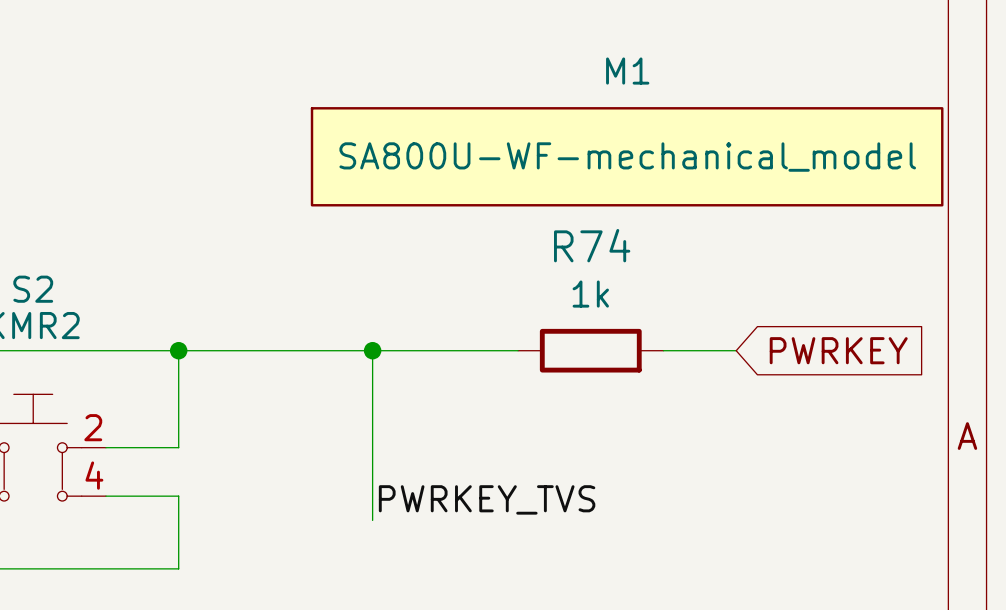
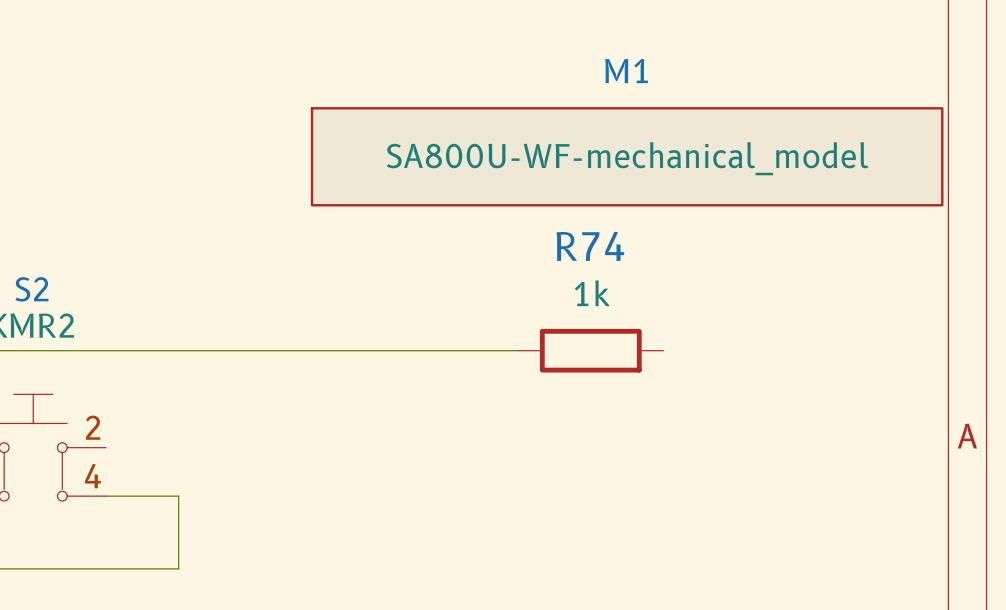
wire: (178, 350) (178, 447) (105, 447) -> none
junction: (178, 350) -> none
wire: (372, 350) (372, 520) -> none
junction: (372, 350) -> none
wire: (663, 350) (736, 350) -> none
global label: PWRKEY (838, 350) -> none
label: PWRKEY_TVS (487, 499) -> none

